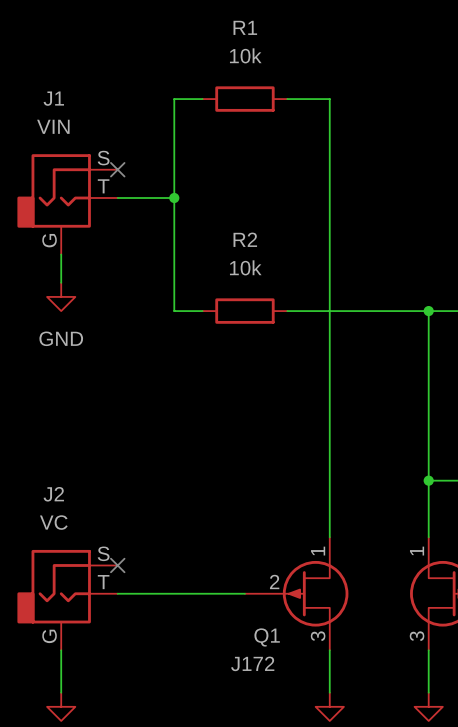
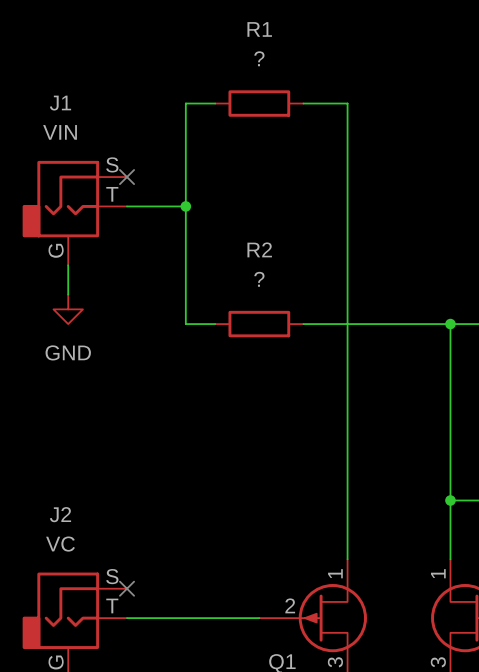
R1 value: 10k (245, 55) -> ? (259, 58)
R2 value: 10k (245, 267) -> ? (259, 279)

